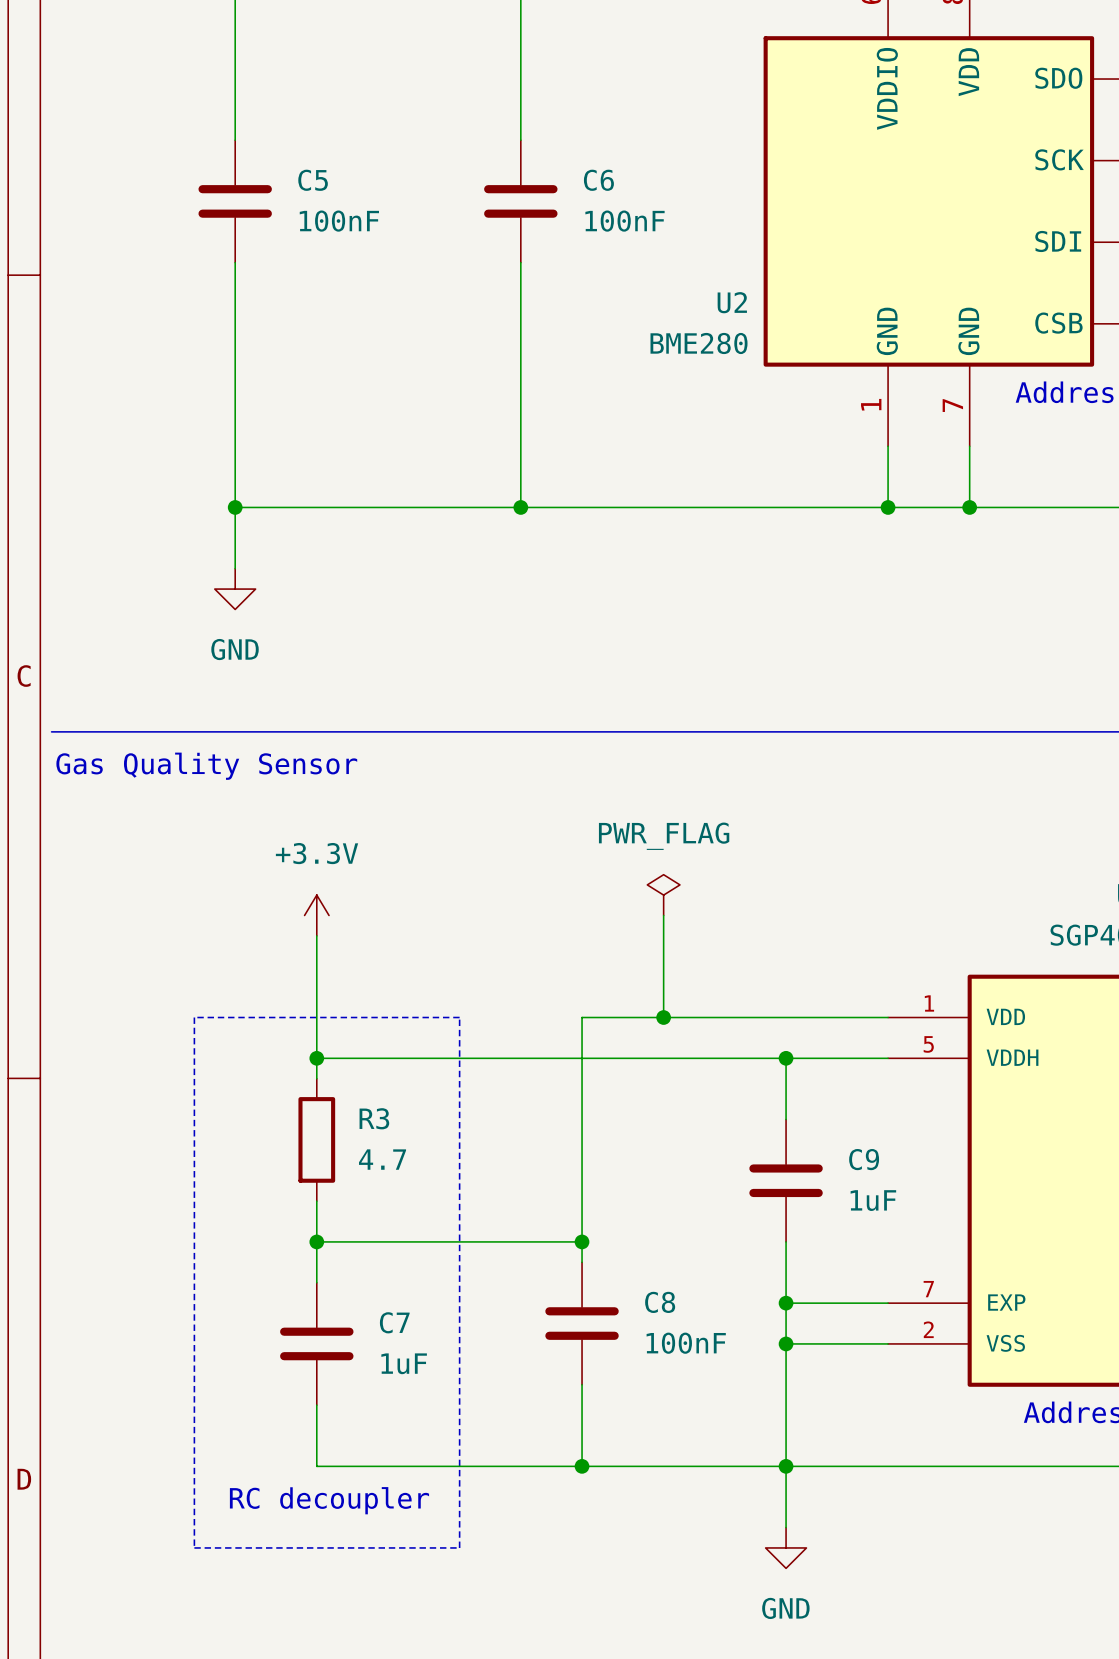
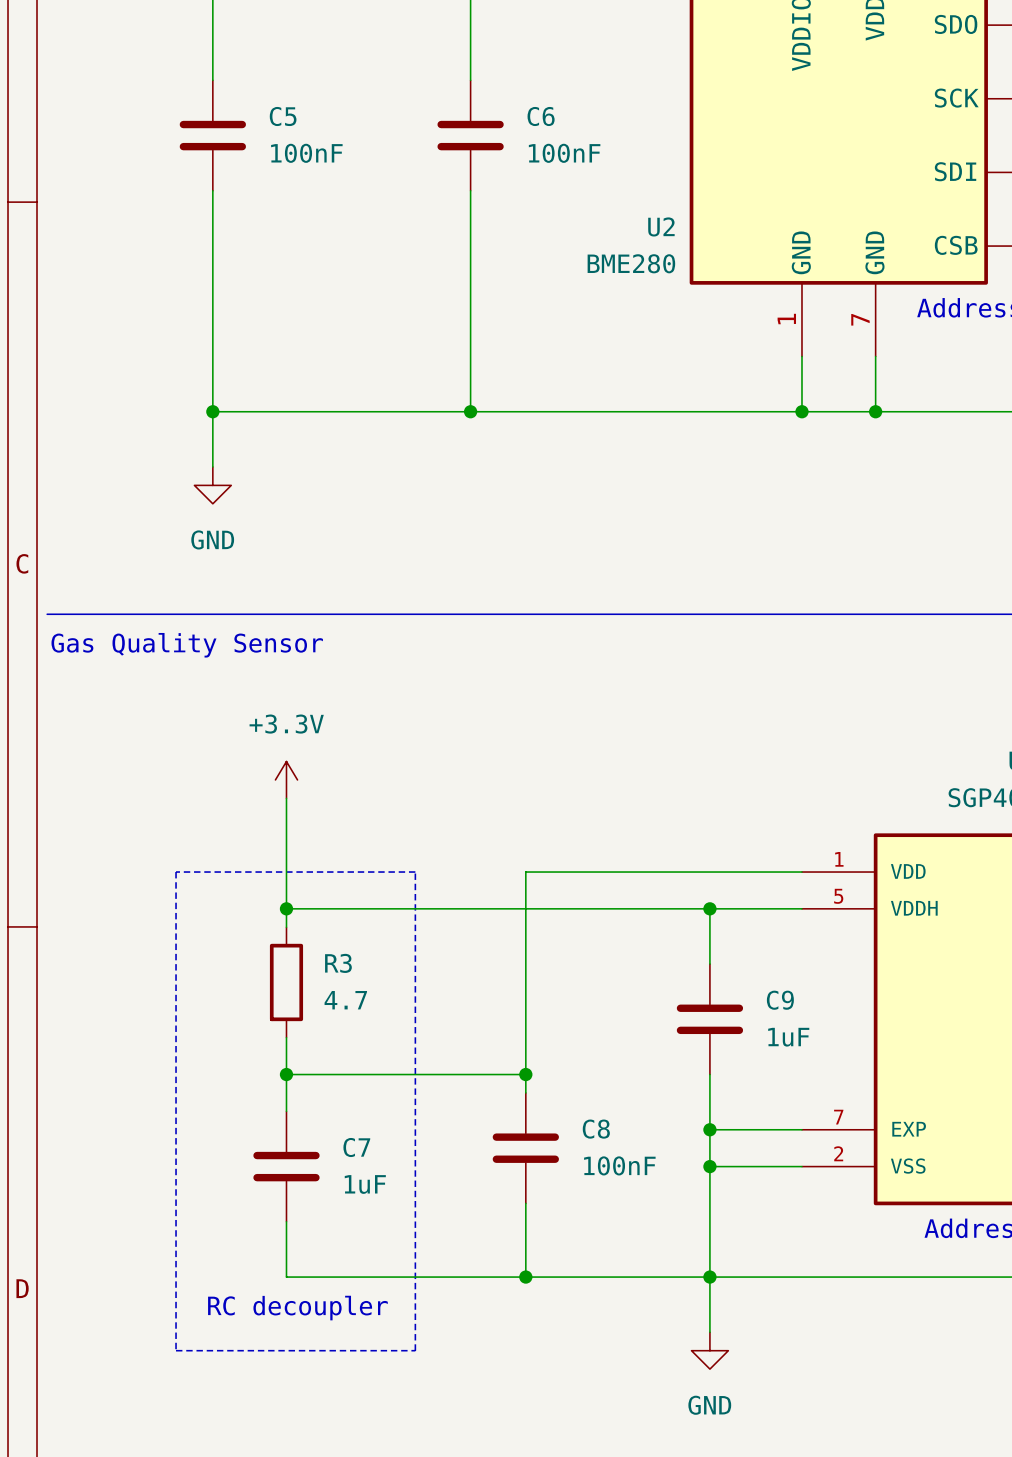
power symbol: PWR_FLAG (663, 895) -> none
wire: (663, 915) (663, 1017) -> none
junction: (663, 1017) -> none

